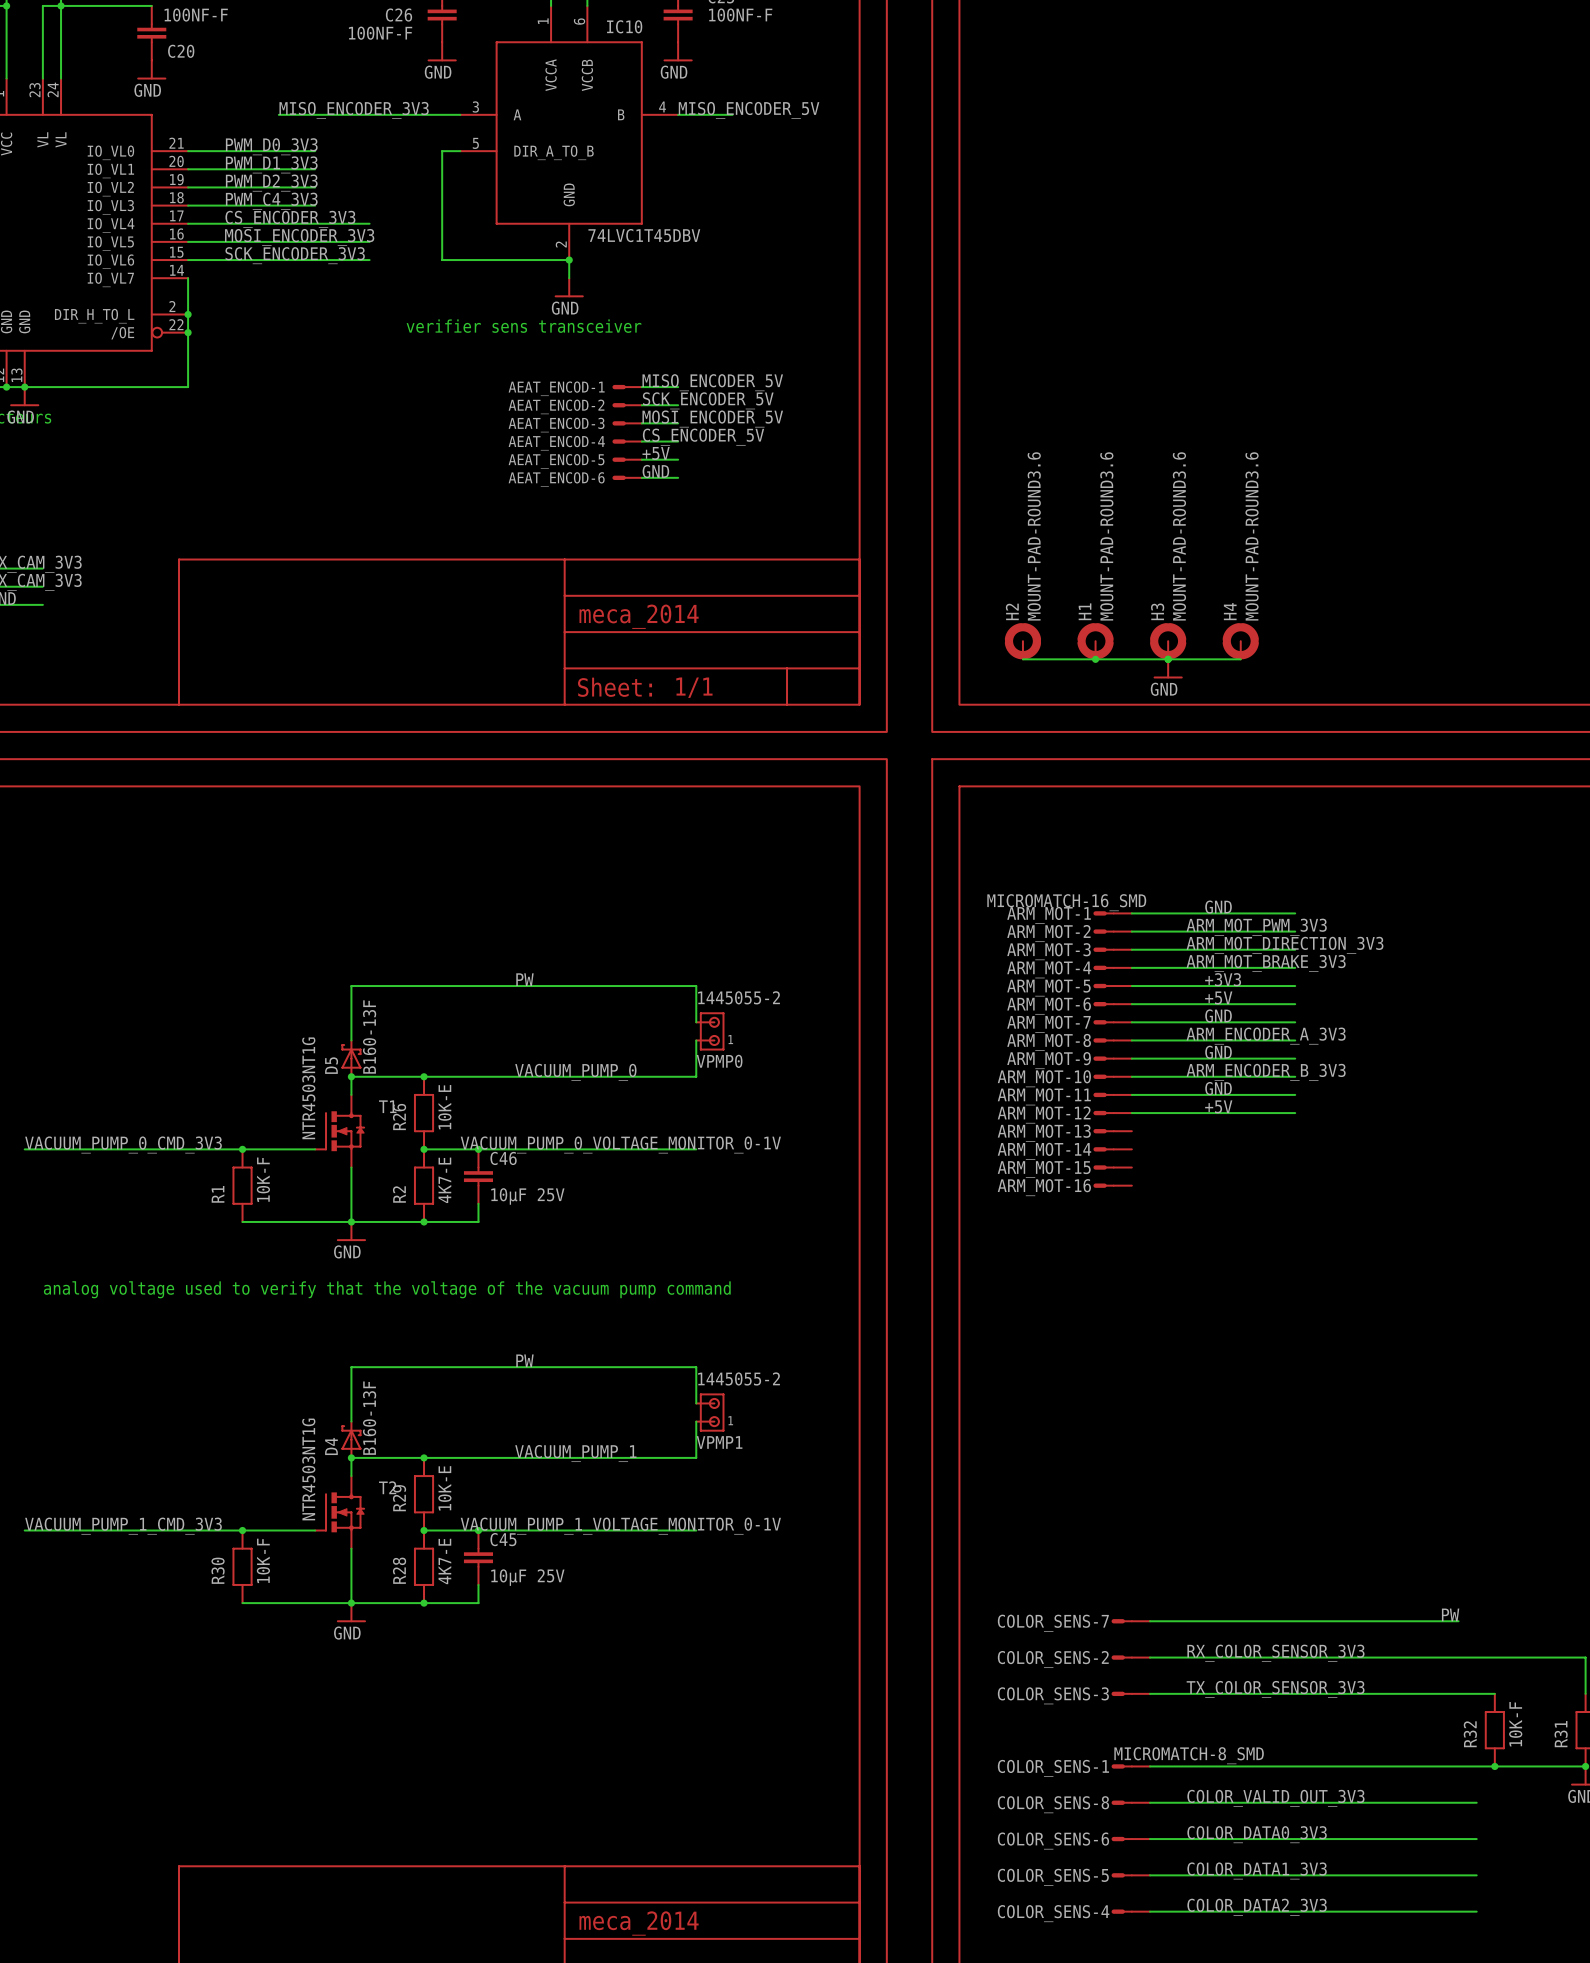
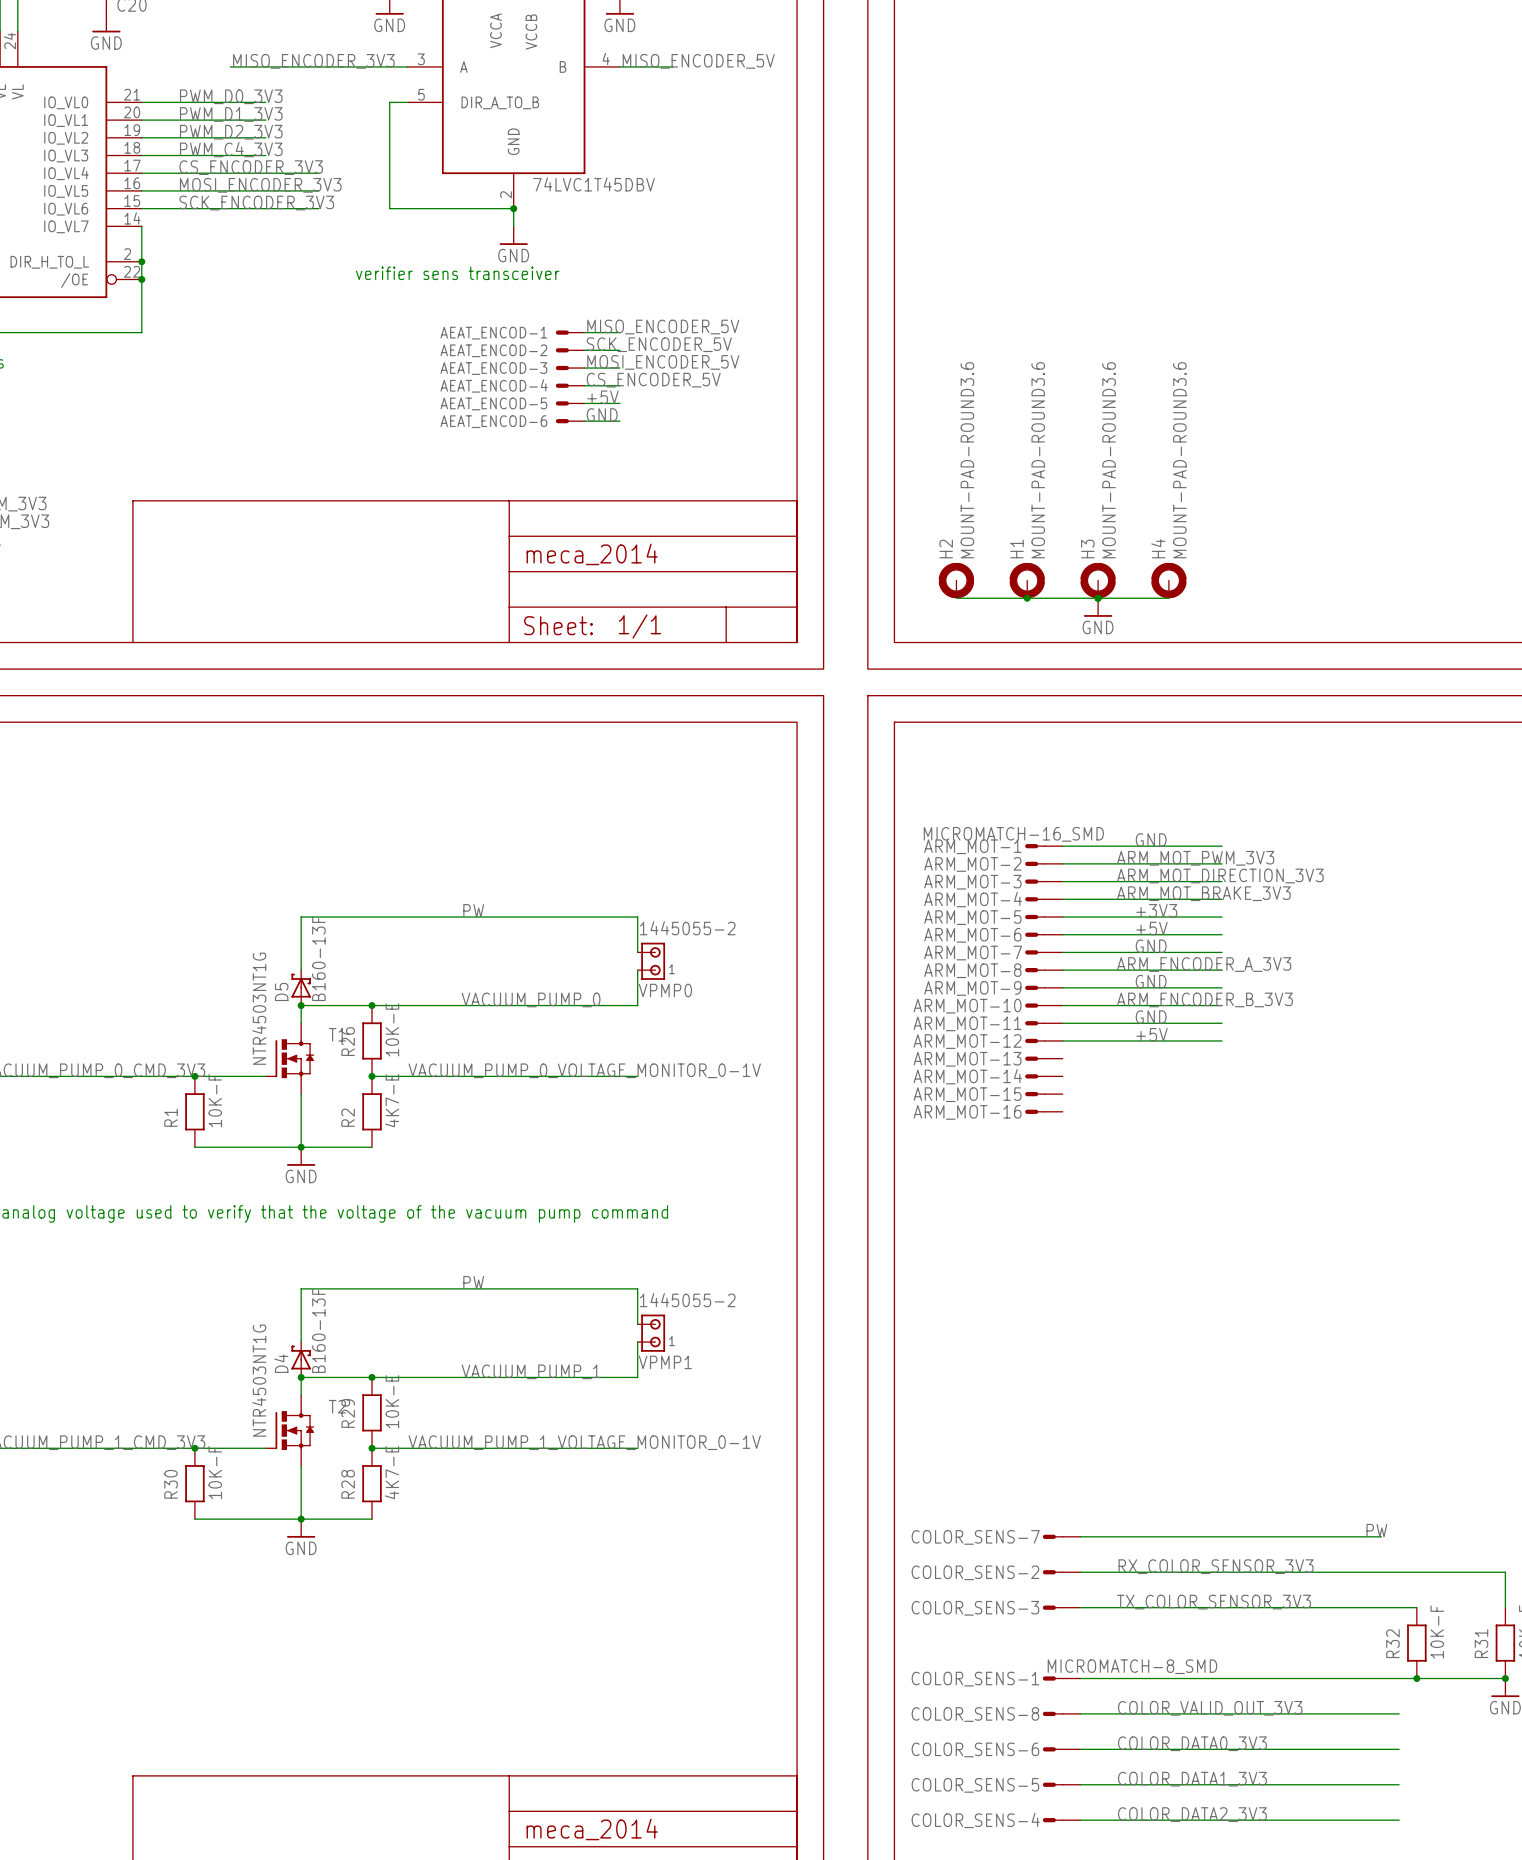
junction: (478, 1149) -> none
C46: 10µF 25V (478, 1176) -> none
wire: (478, 1203) (478, 1221) (424, 1221) -> none
junction: (424, 1221) -> none
junction: (478, 1530) -> none
C45: 10µF 25V (478, 1557) -> none
wire: (478, 1584) (478, 1603) (424, 1603) -> none
junction: (424, 1603) -> none

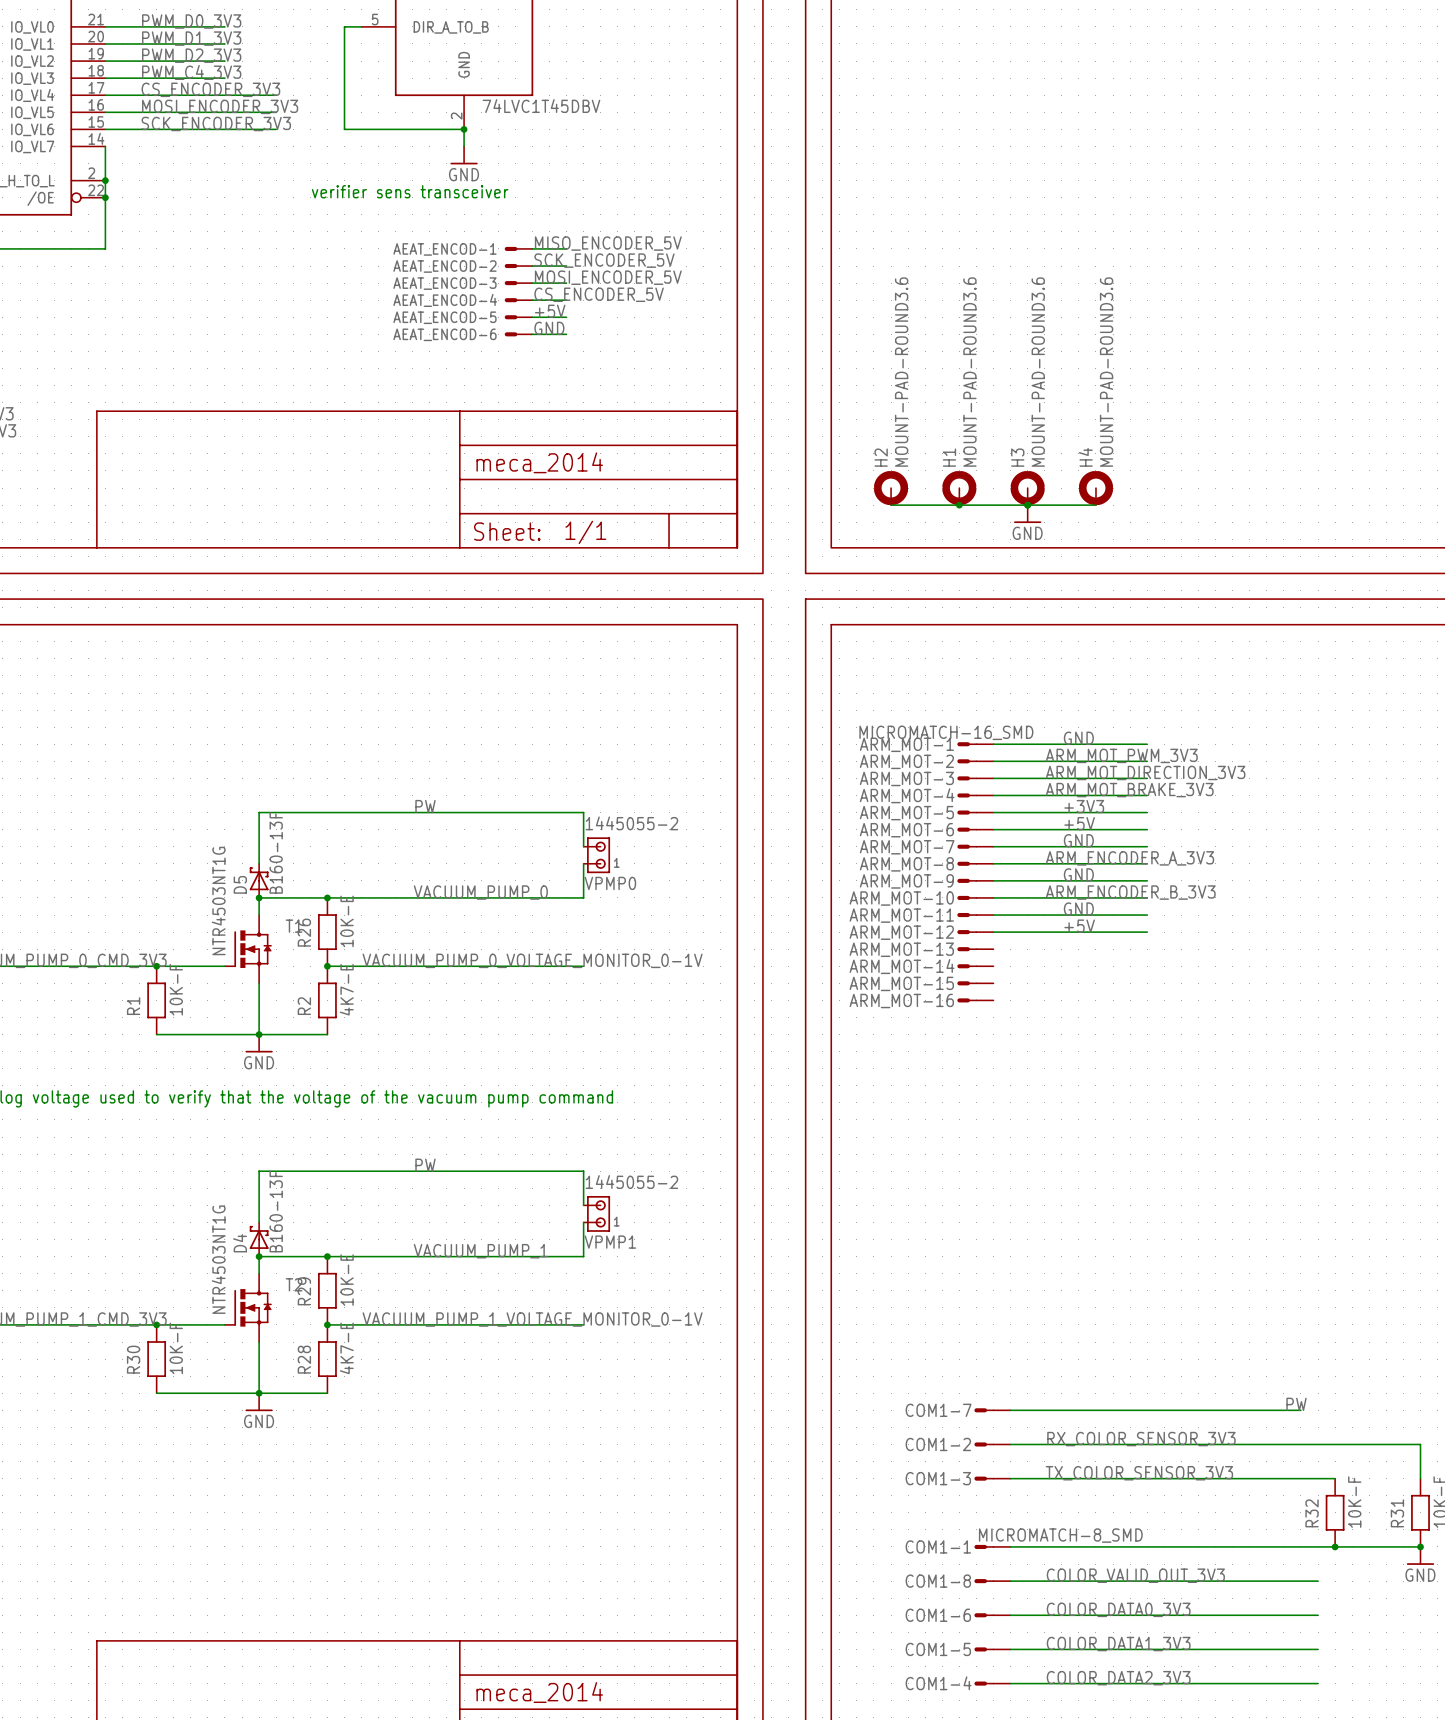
COLOR_SENS-7 name: COLOR_SENS-7 (975, 1537) -> COM1-7 (938, 1410)
COLOR_SENS-2 name: COLOR_SENS-2 (975, 1572) -> COM1-2 (938, 1444)
COLOR_SENS-3 name: COLOR_SENS-3 (975, 1608) -> COM1-3 (938, 1478)
COLOR_SENS-1 name: COLOR_SENS-1 (975, 1679) -> COM1-1 (938, 1546)
COLOR_SENS-8 name: COLOR_SENS-8 (975, 1714) -> COM1-8 (938, 1581)
COLOR_SENS-6 name: COLOR_SENS-6 (975, 1749) -> COM1-6 (938, 1615)
COLOR_SENS-5 name: COLOR_SENS-5 (975, 1785) -> COM1-5 (938, 1649)
COLOR_SENS-4 name: COLOR_SENS-4 (975, 1820) -> COM1-4 (938, 1683)

